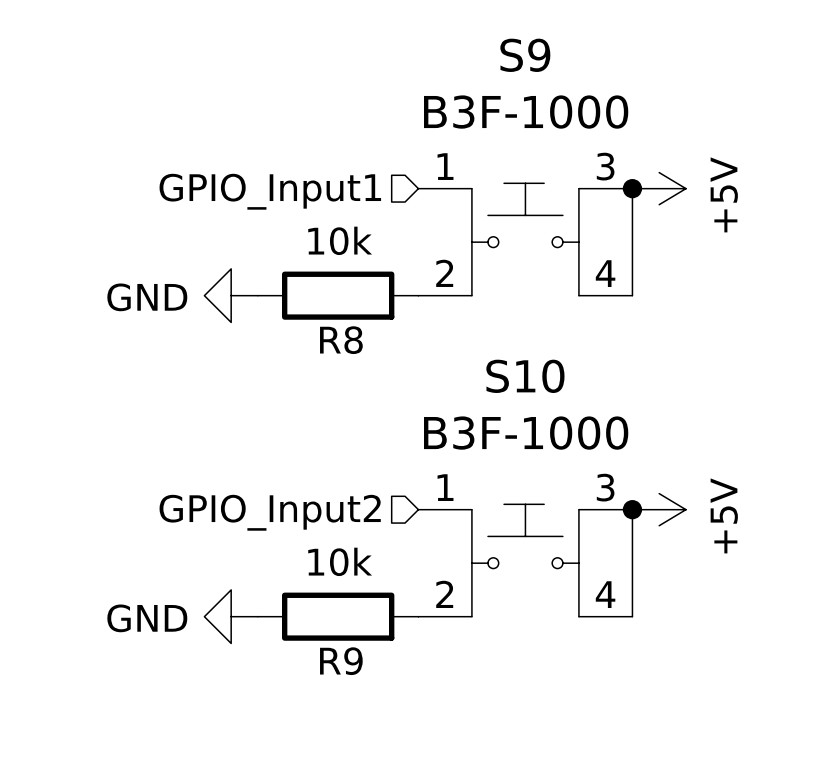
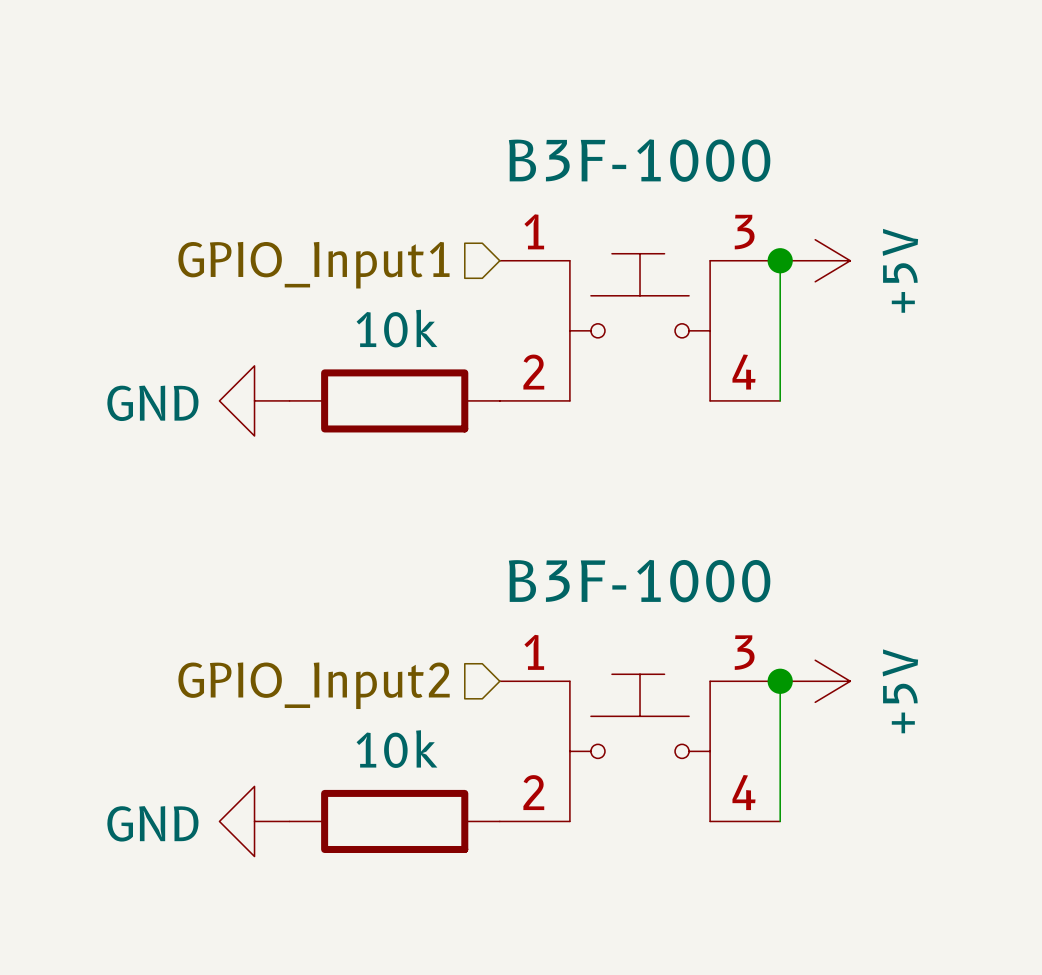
S9 name: S9 (525, 55) -> none
R8 name: R8 (341, 340) -> none
S10 name: S10 (525, 376) -> none
R9 name: R9 (341, 661) -> none

